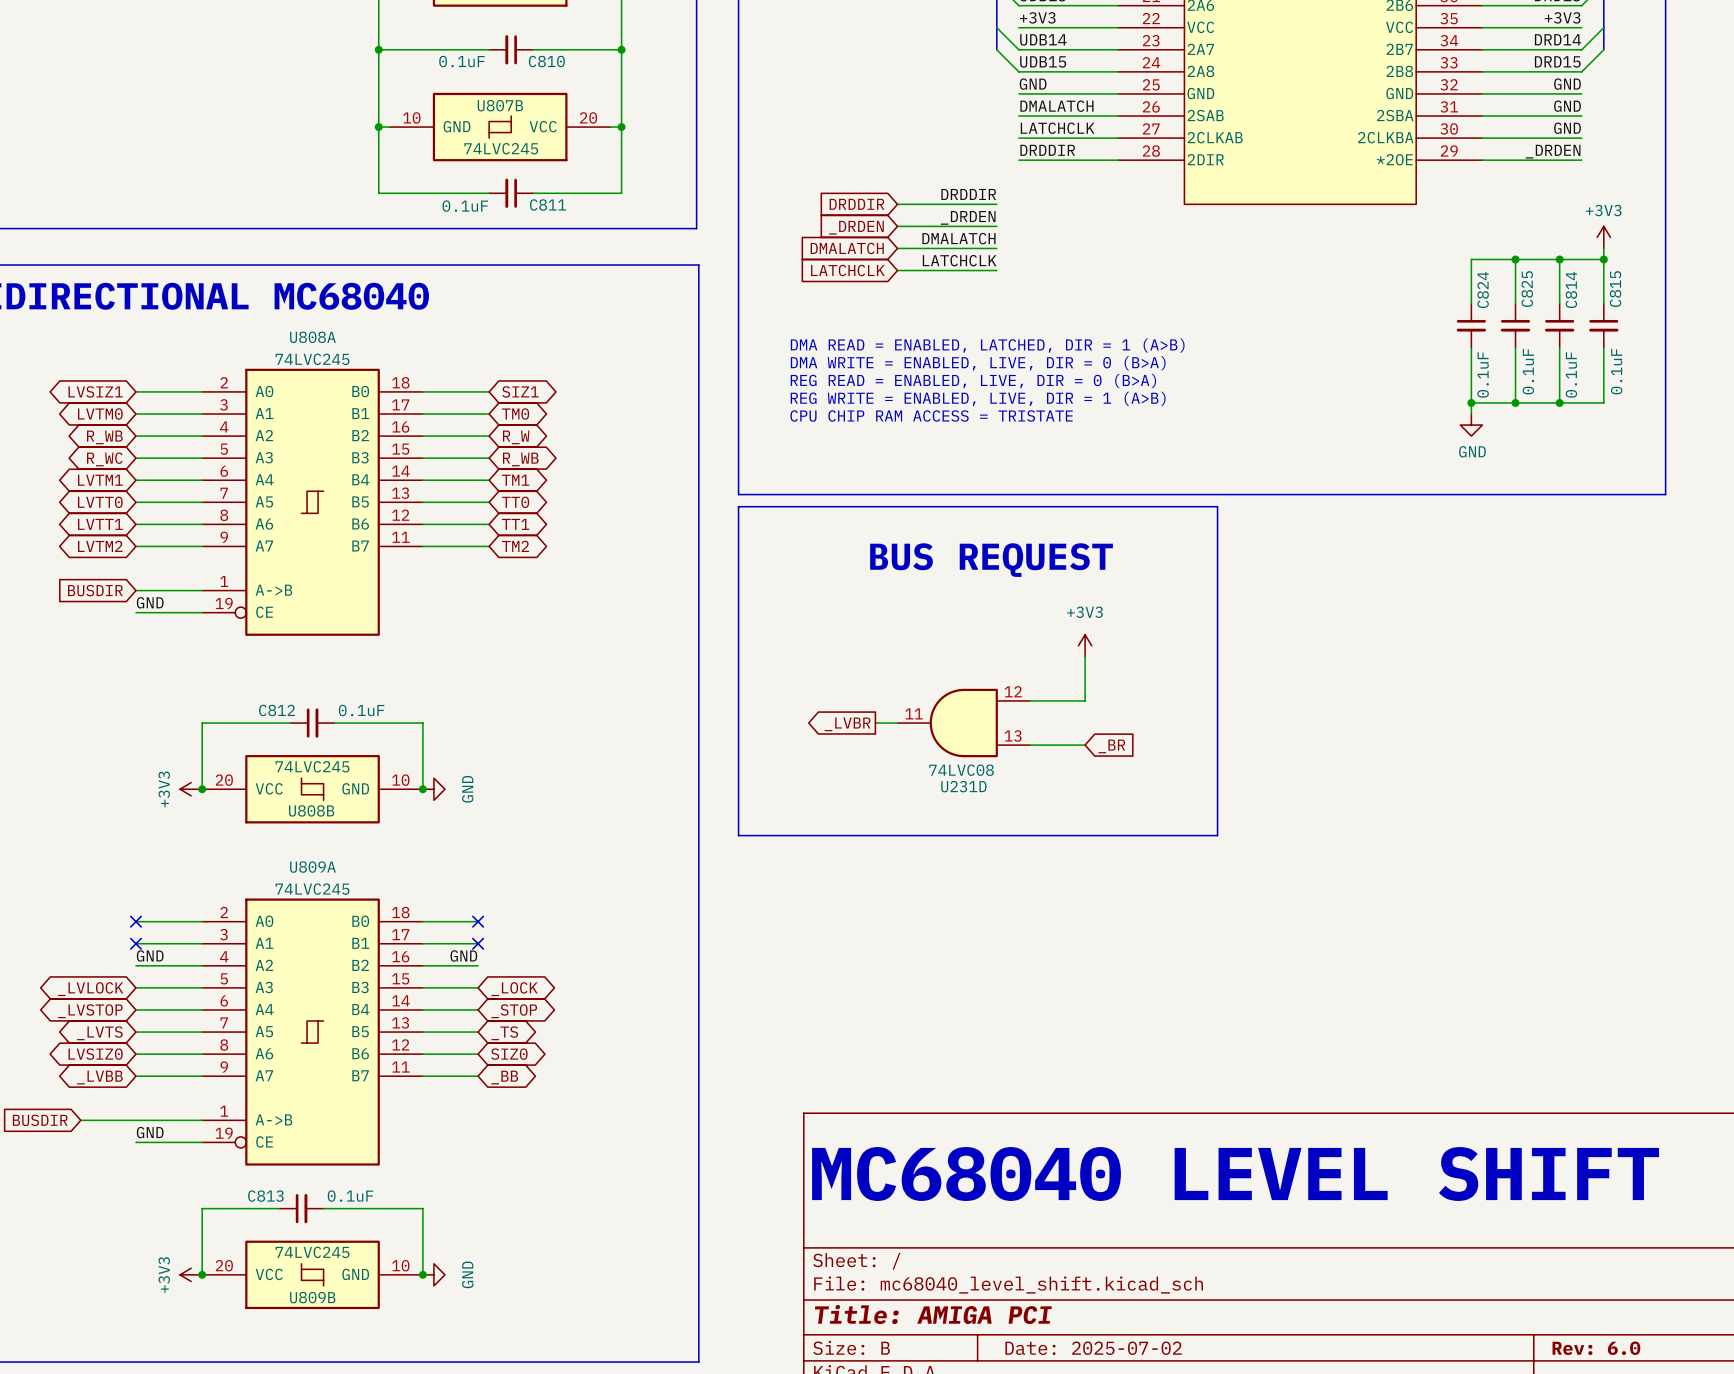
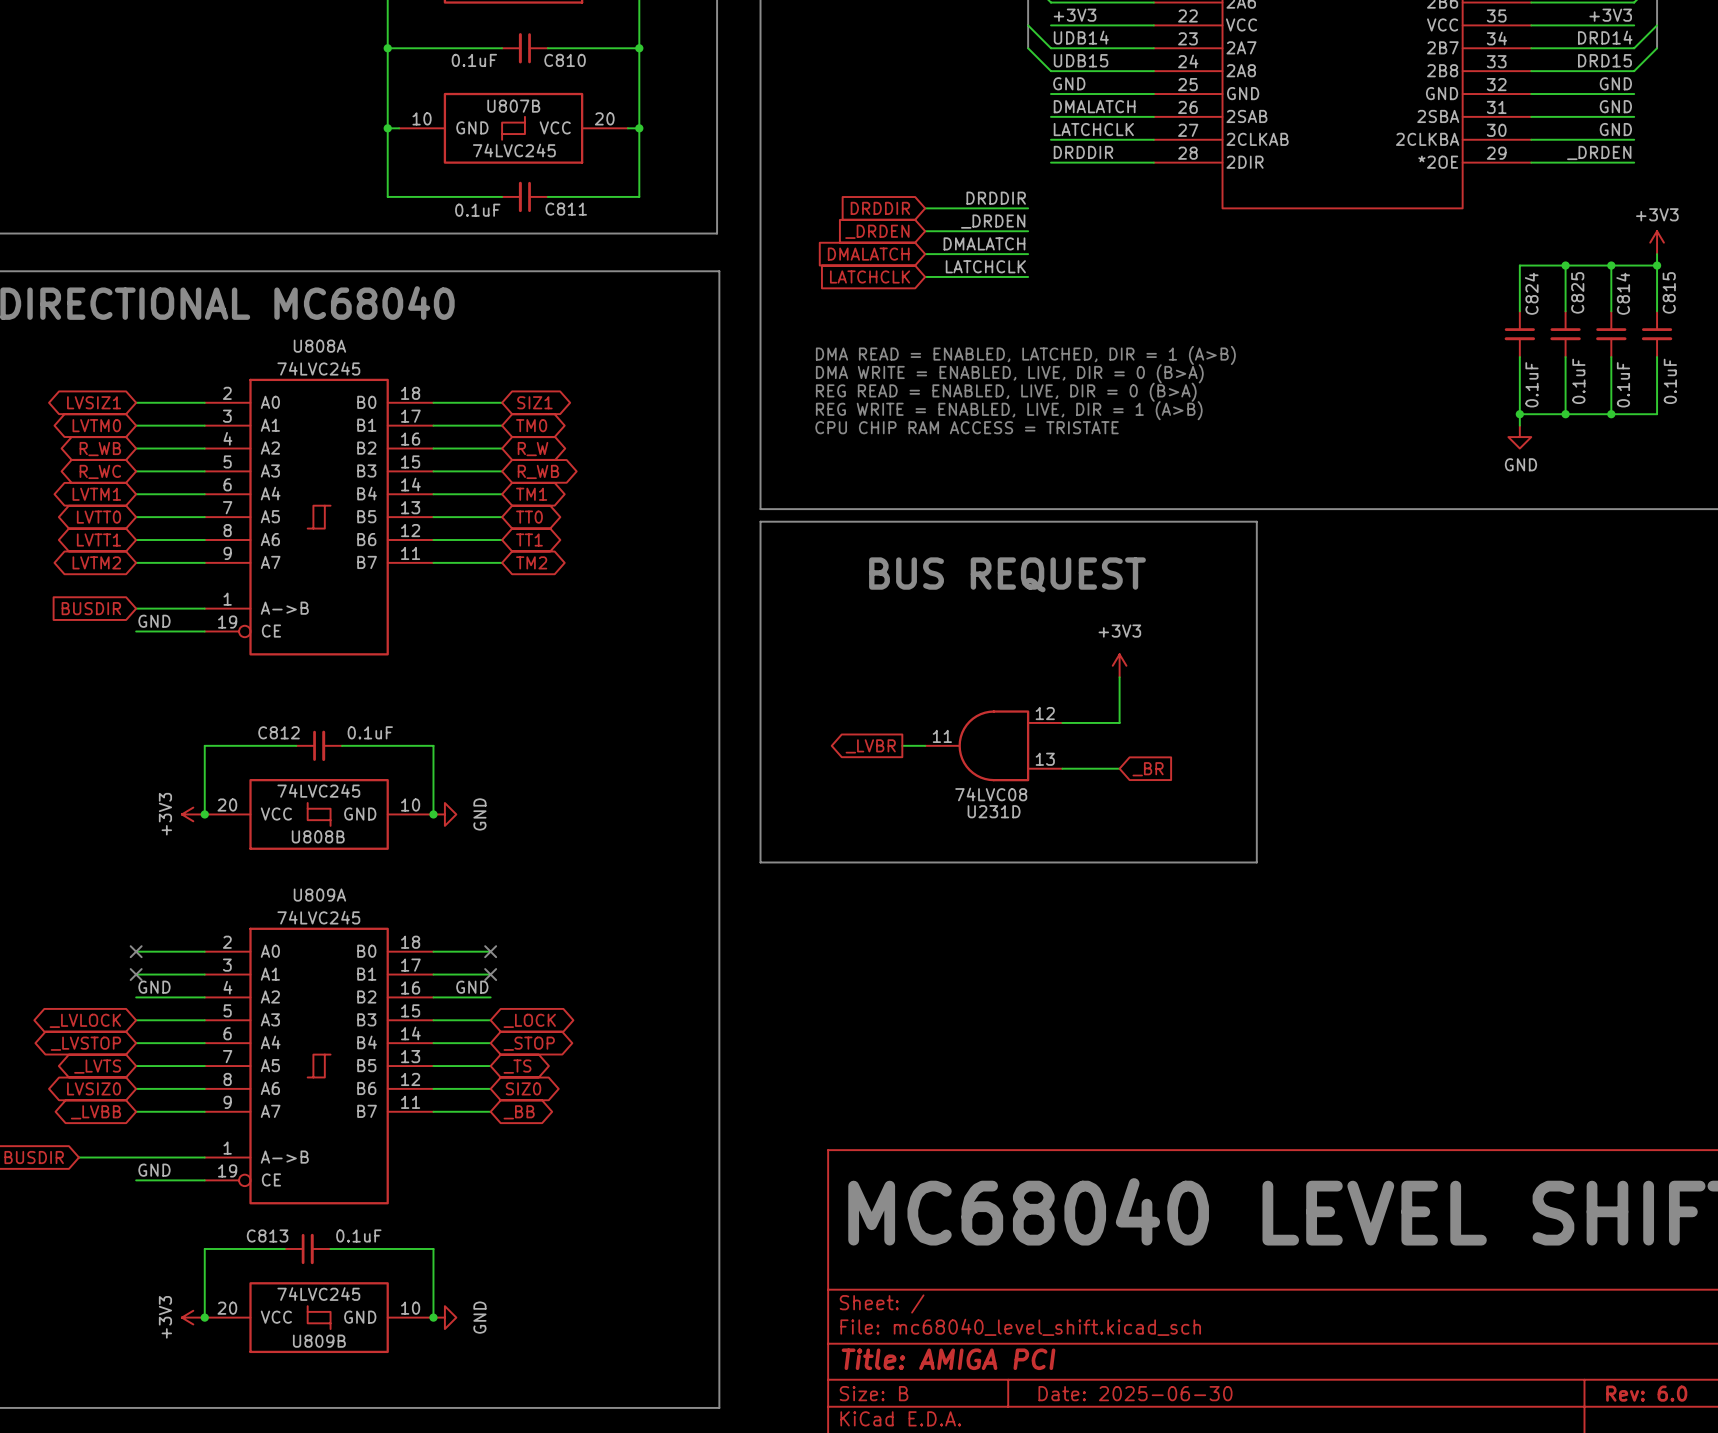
title block: Date: 2025-07-02 (1093, 1348) -> Date: 2025-06-30 (1135, 1393)

